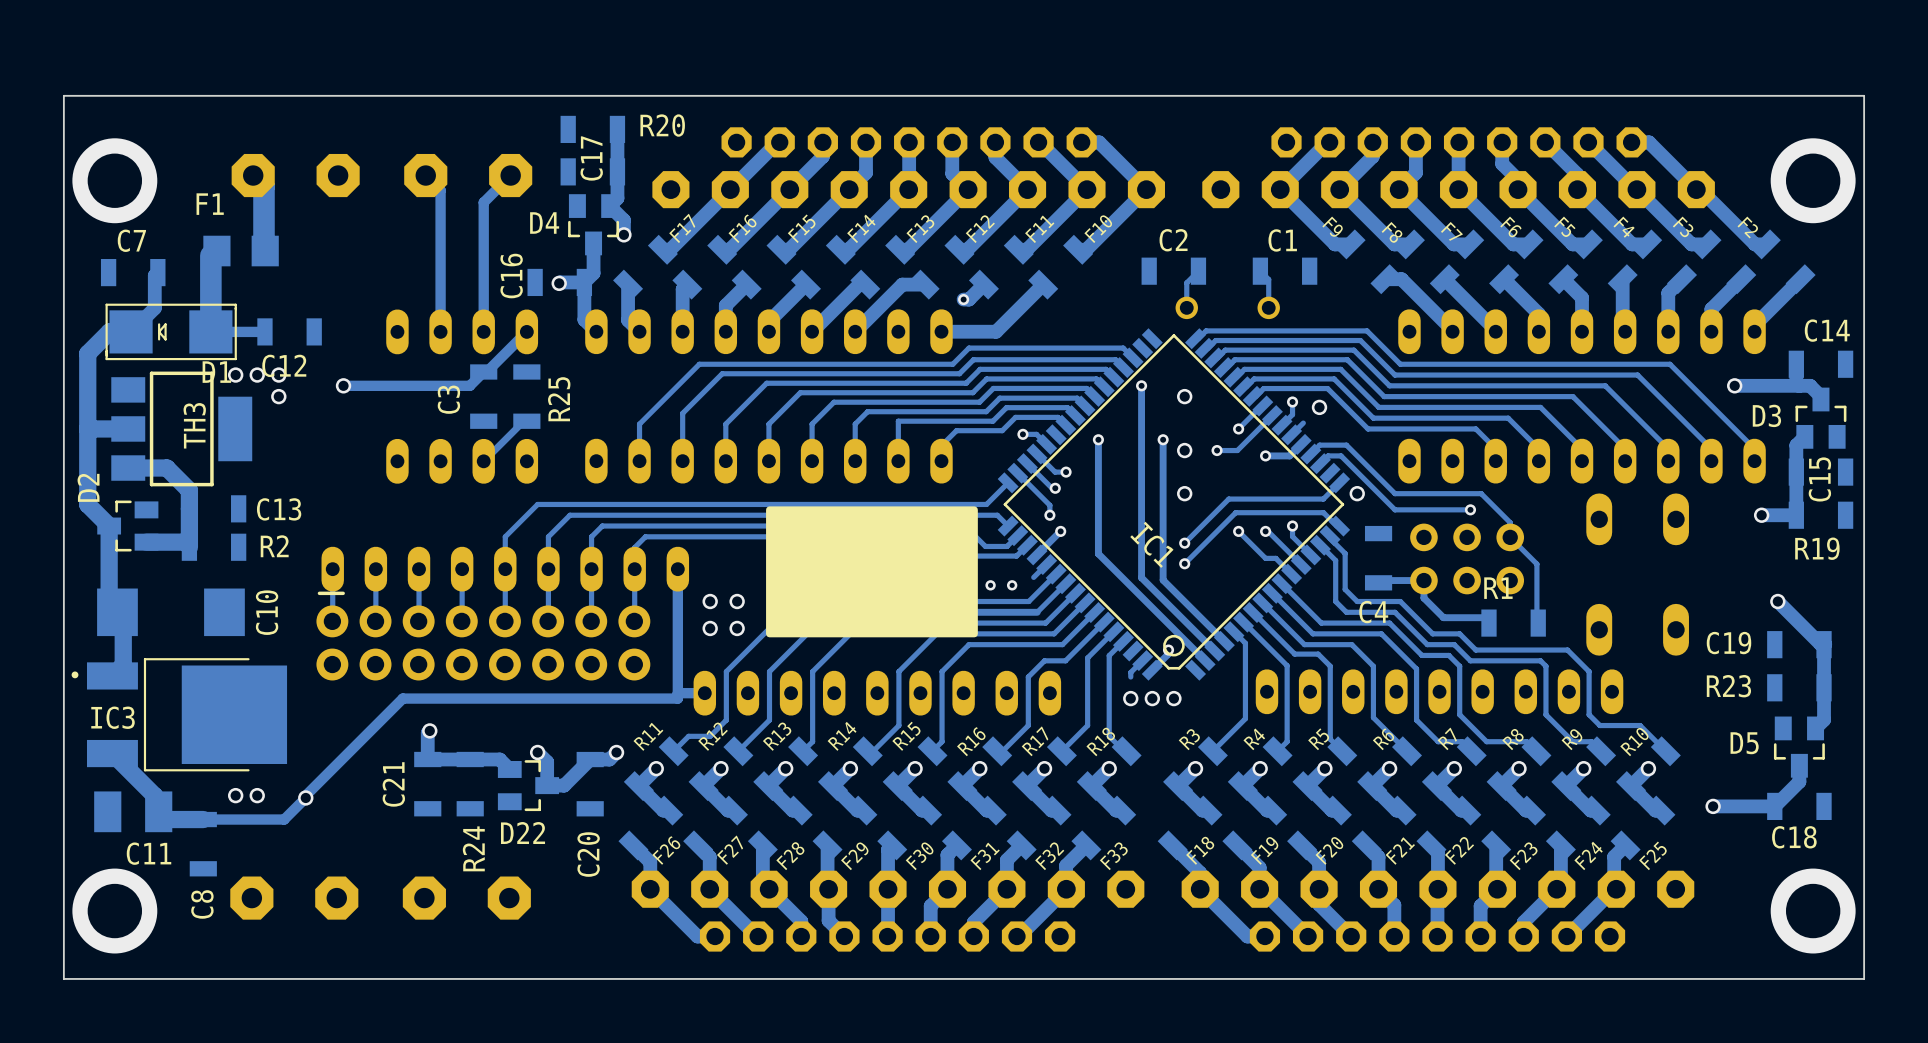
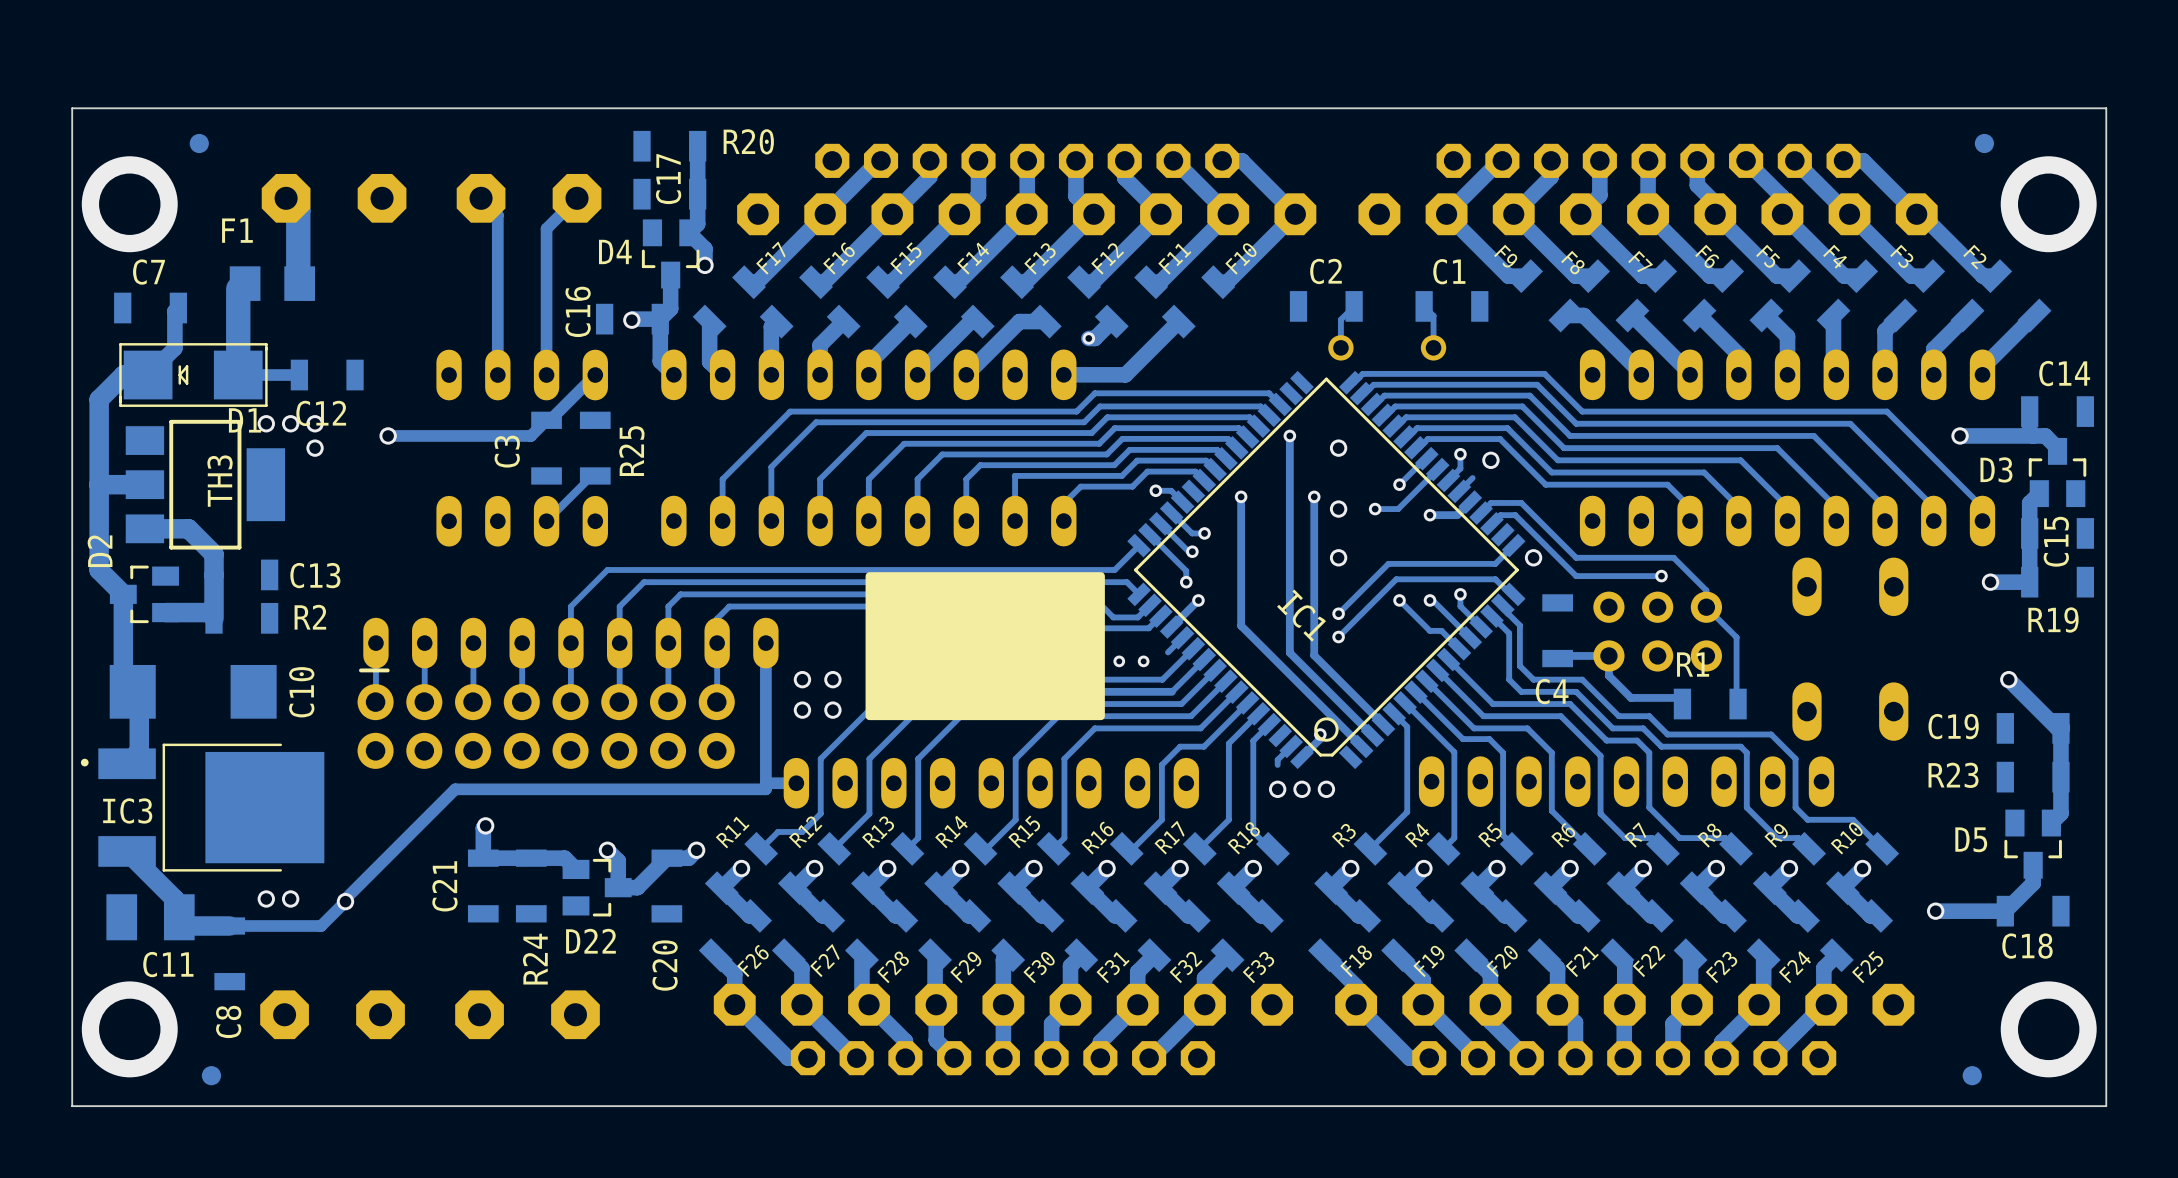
part: none -> (199, 143)
part: none -> (1984, 143)
part: none -> (211, 1075)
part: none -> (1972, 1075)

